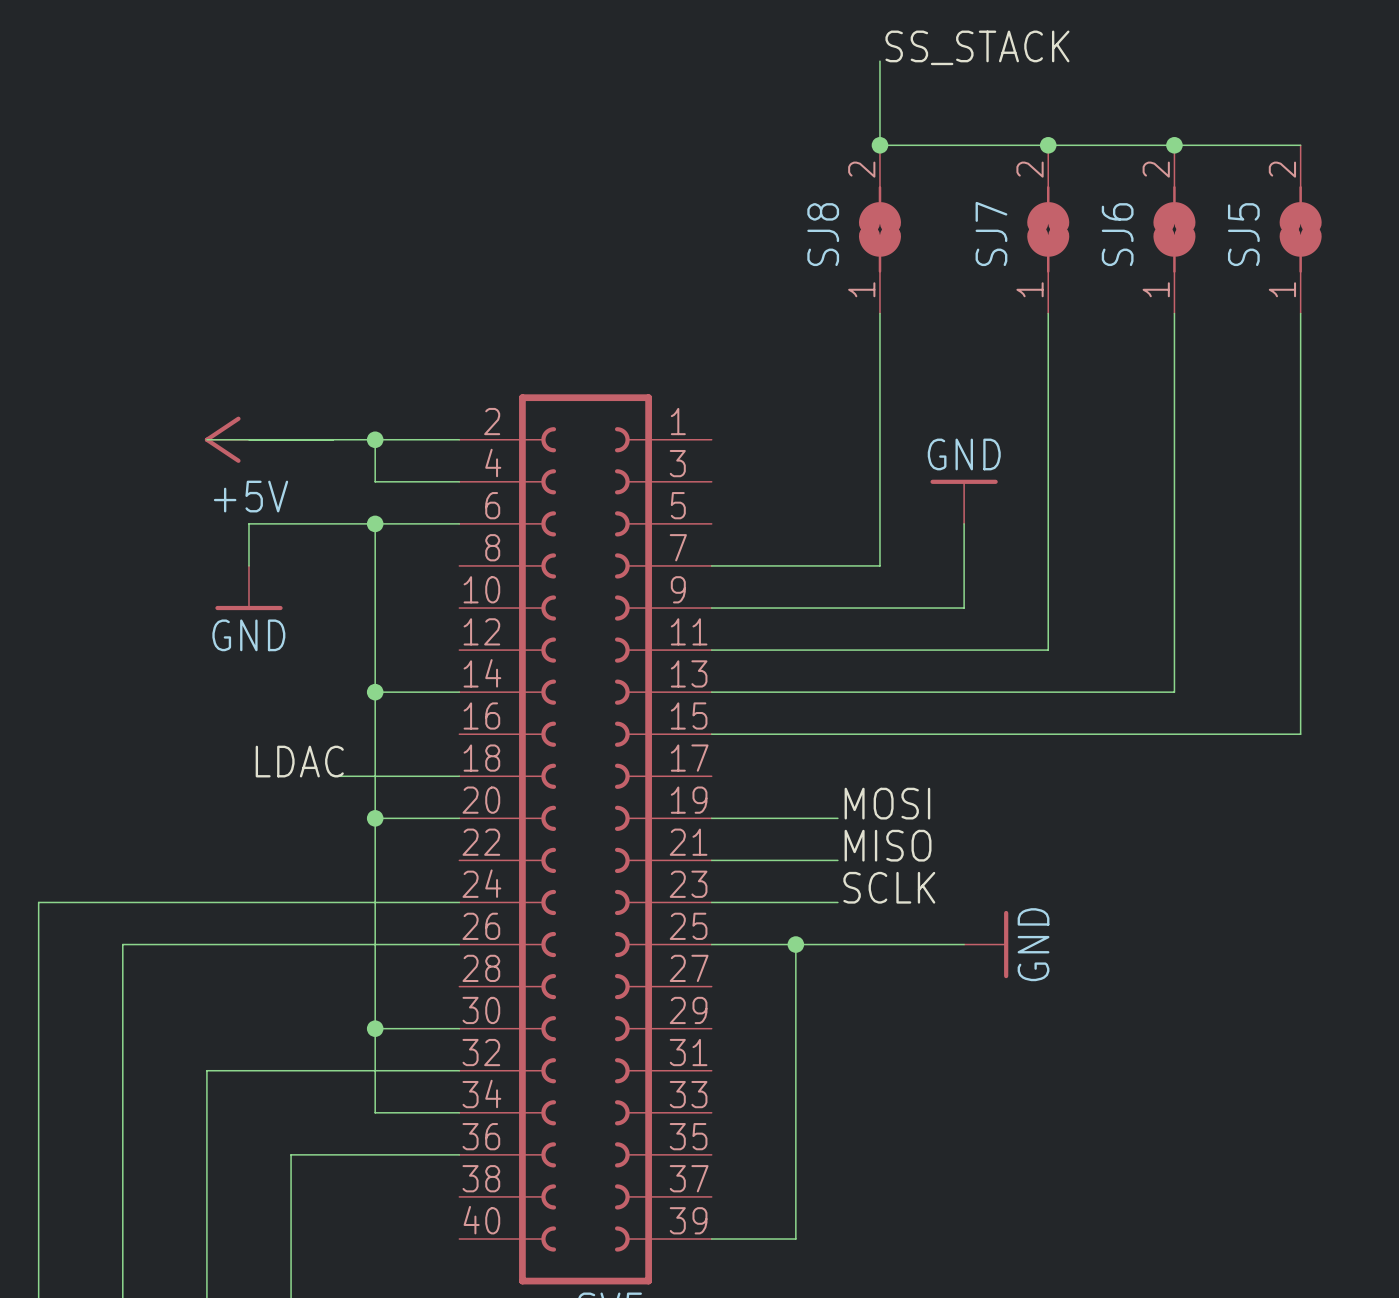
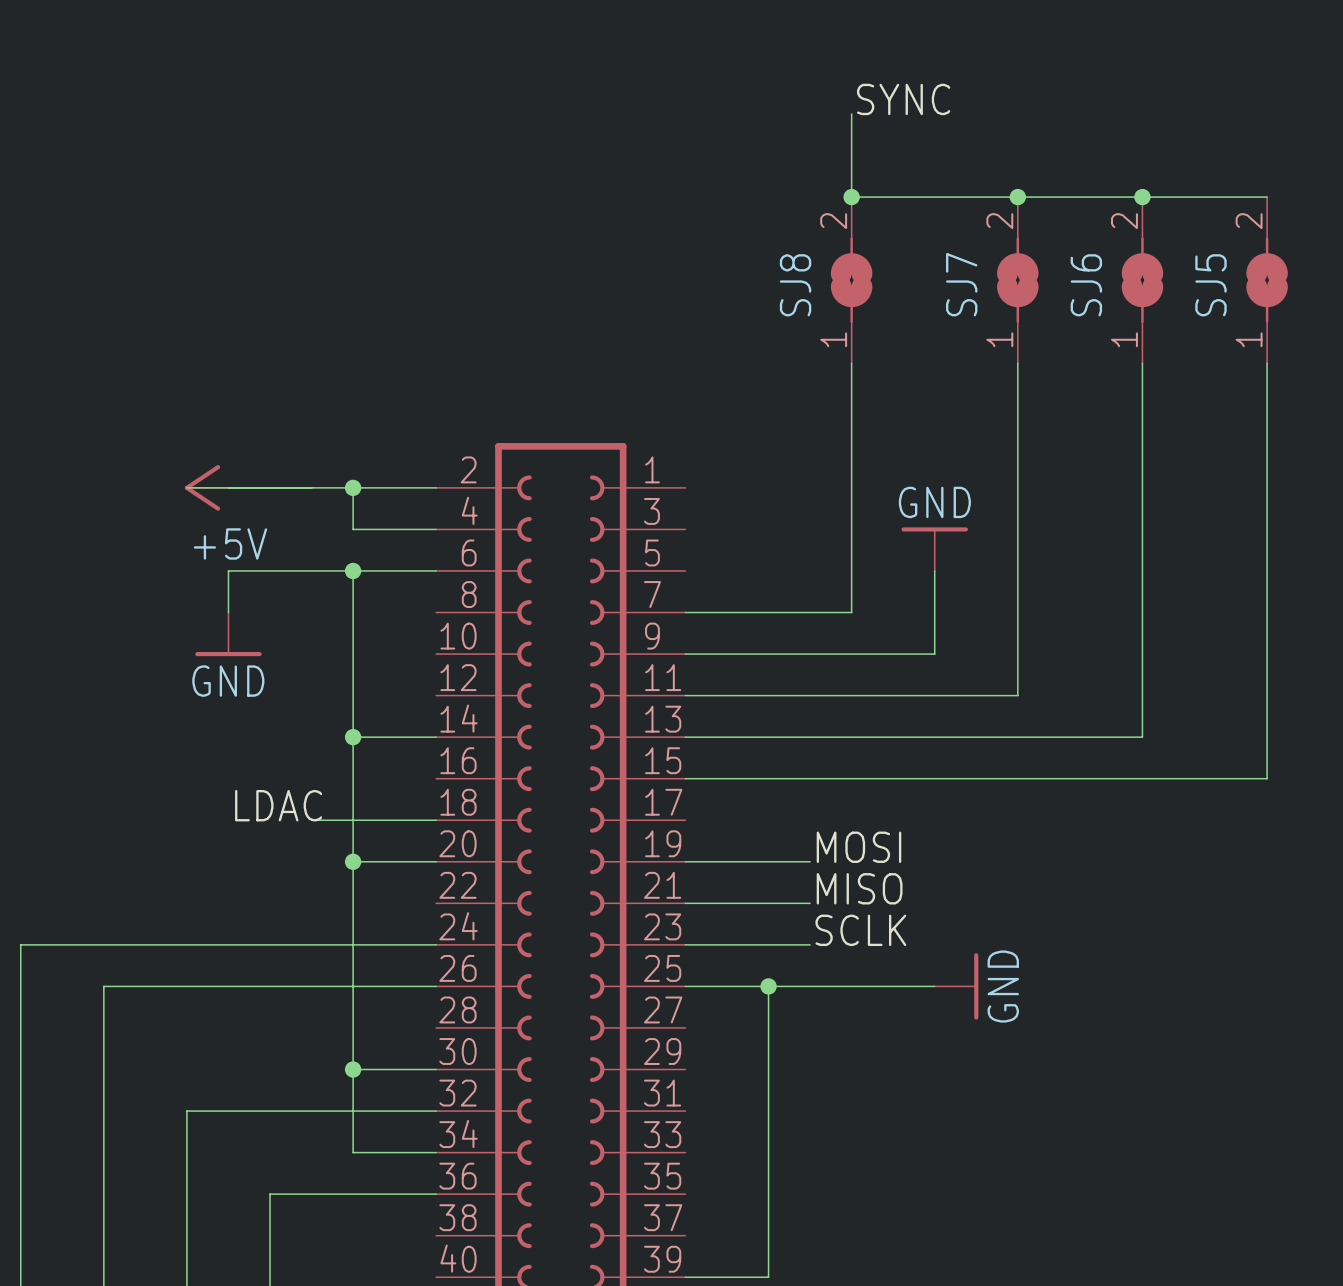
label: SS_STACK (977, 47) -> SYNC (903, 99)

